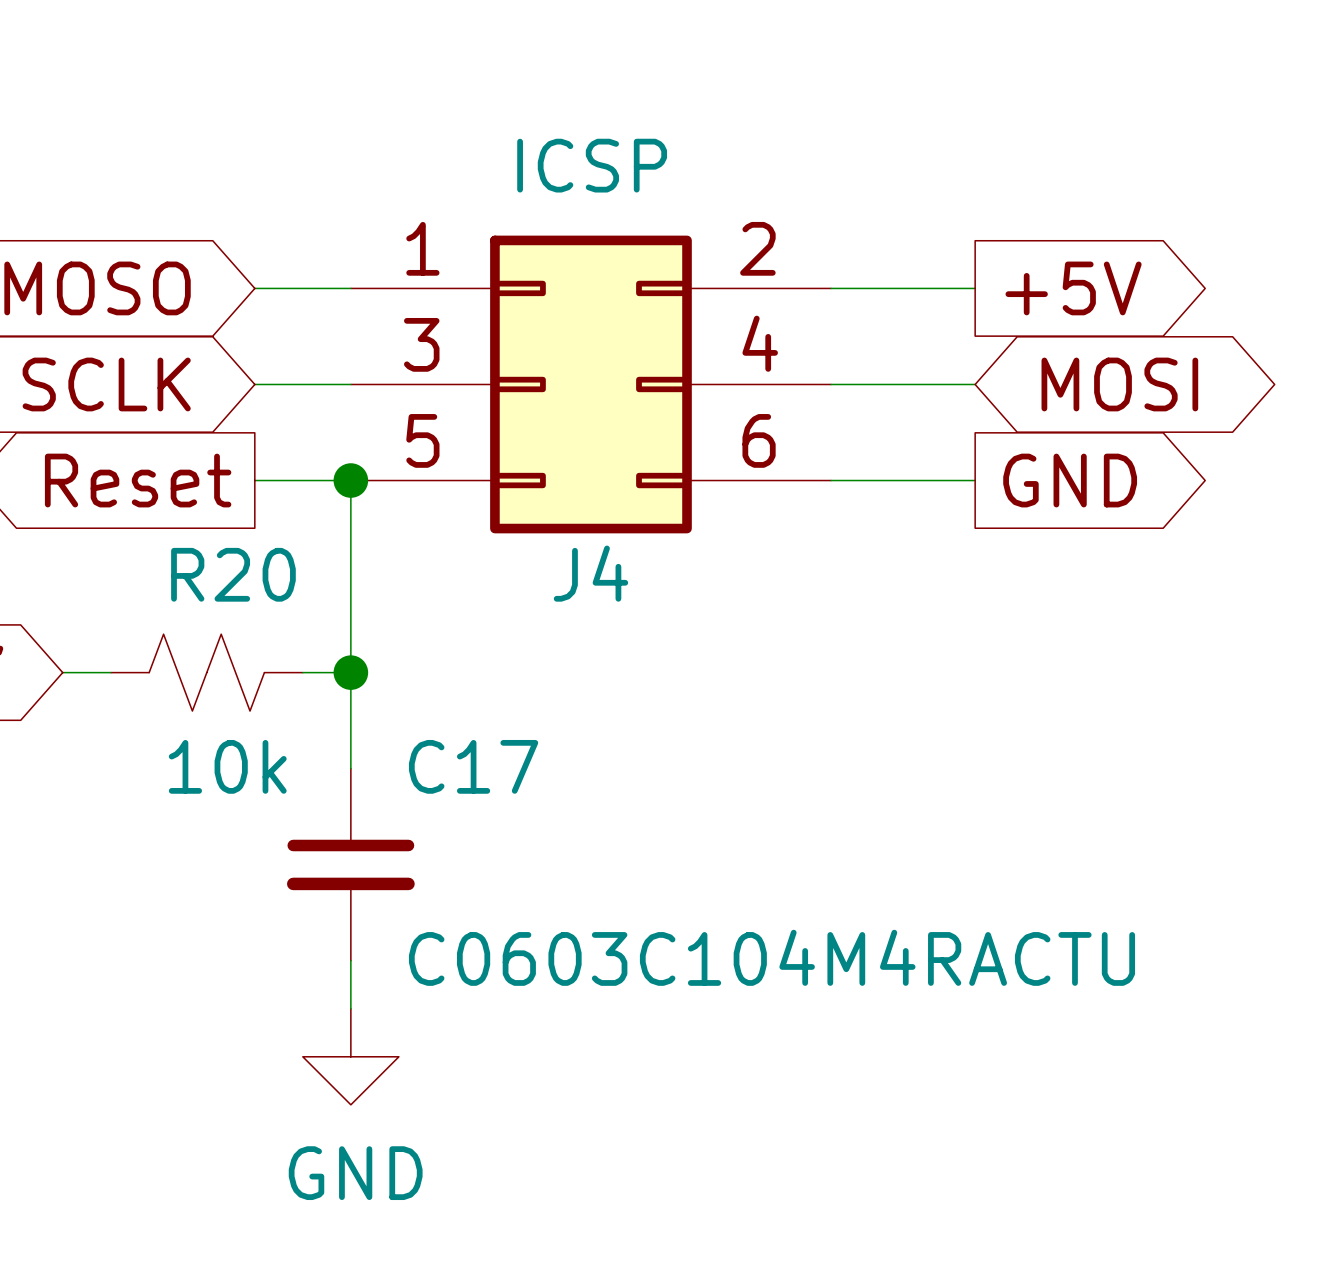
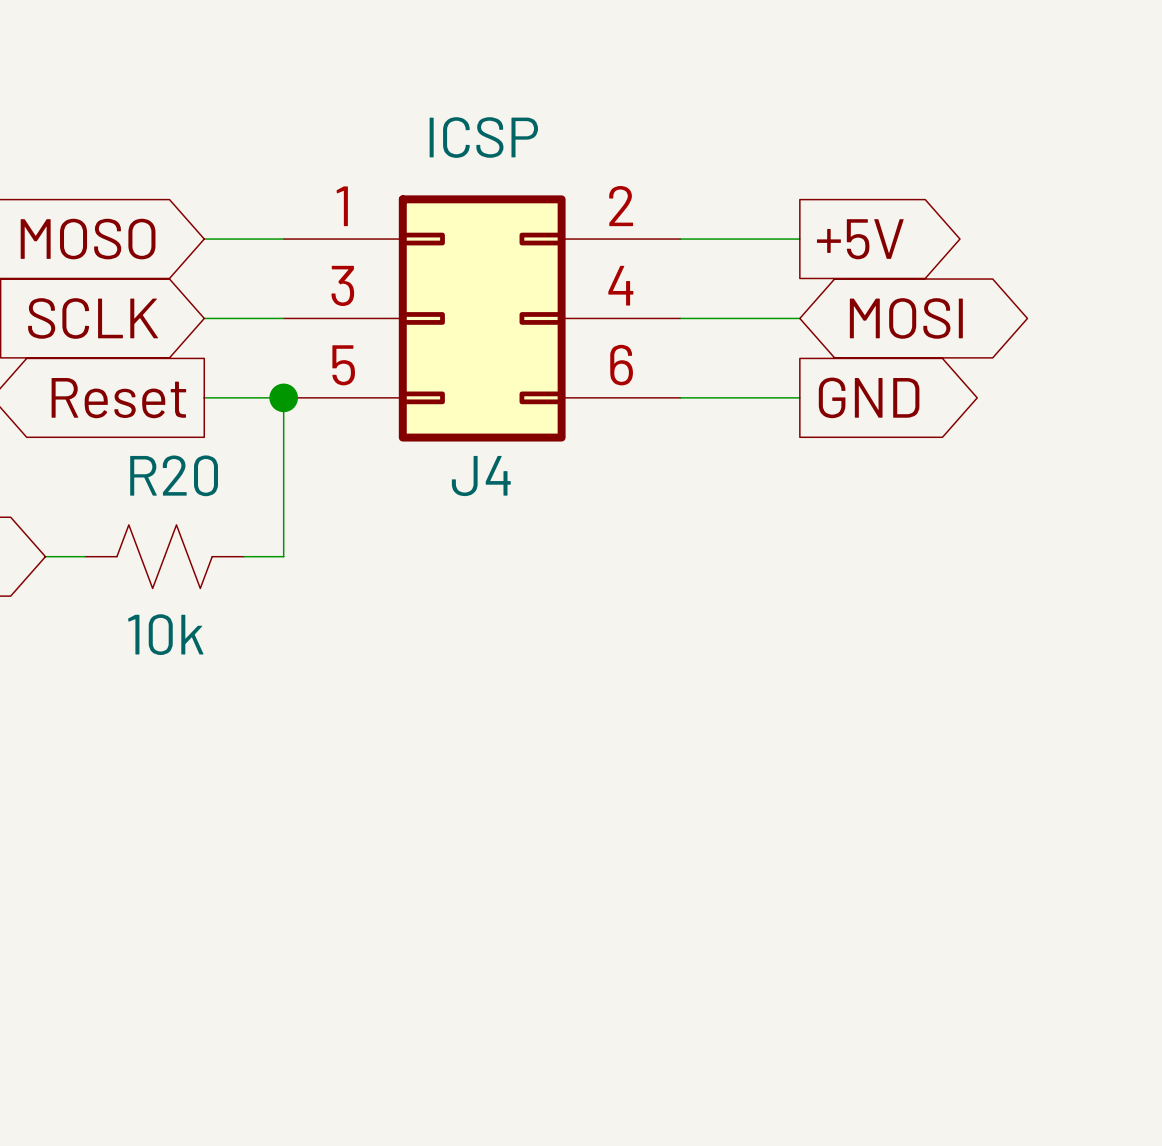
wire: (350, 672) (350, 768) -> none
junction: (350, 672) -> none
C17: C0603C104M4RACTU (350, 864) -> none
wire: (350, 960) (350, 1008) -> none
power symbol: GND (350, 1056) -> none

